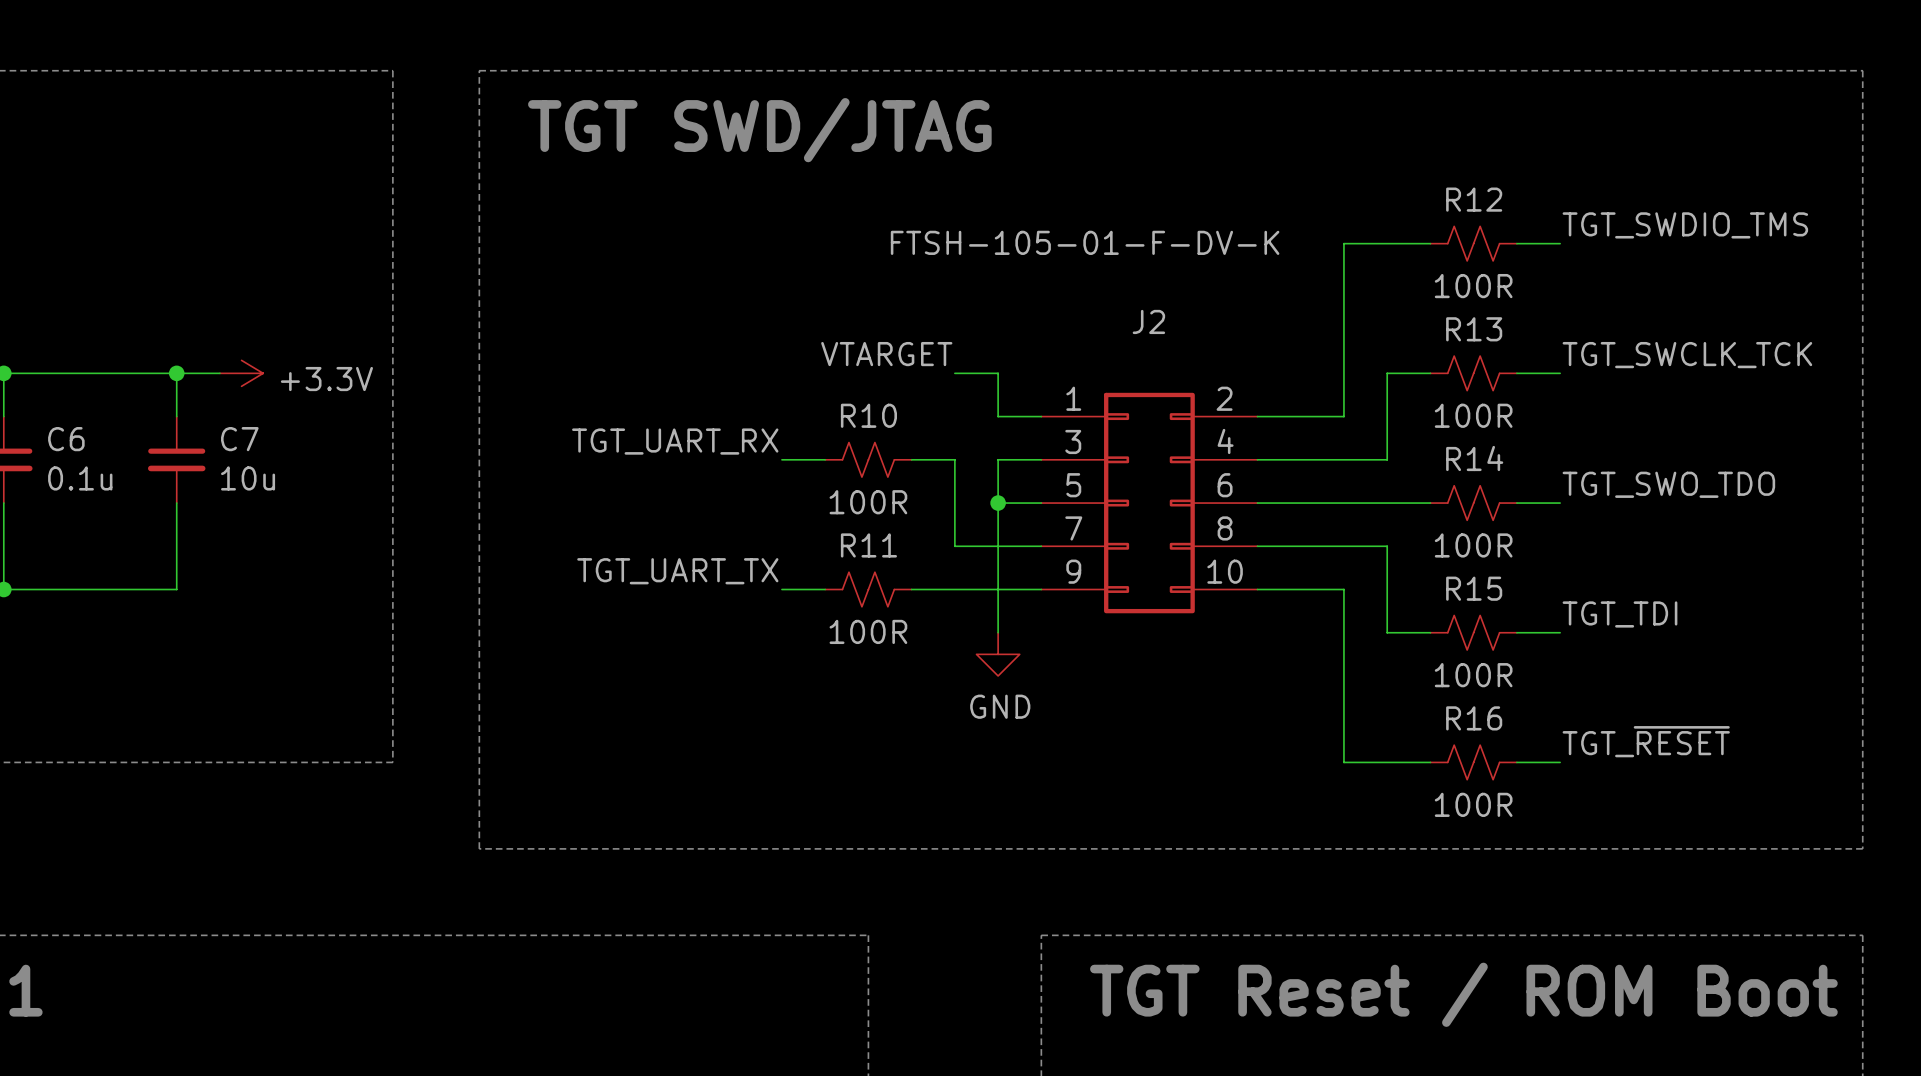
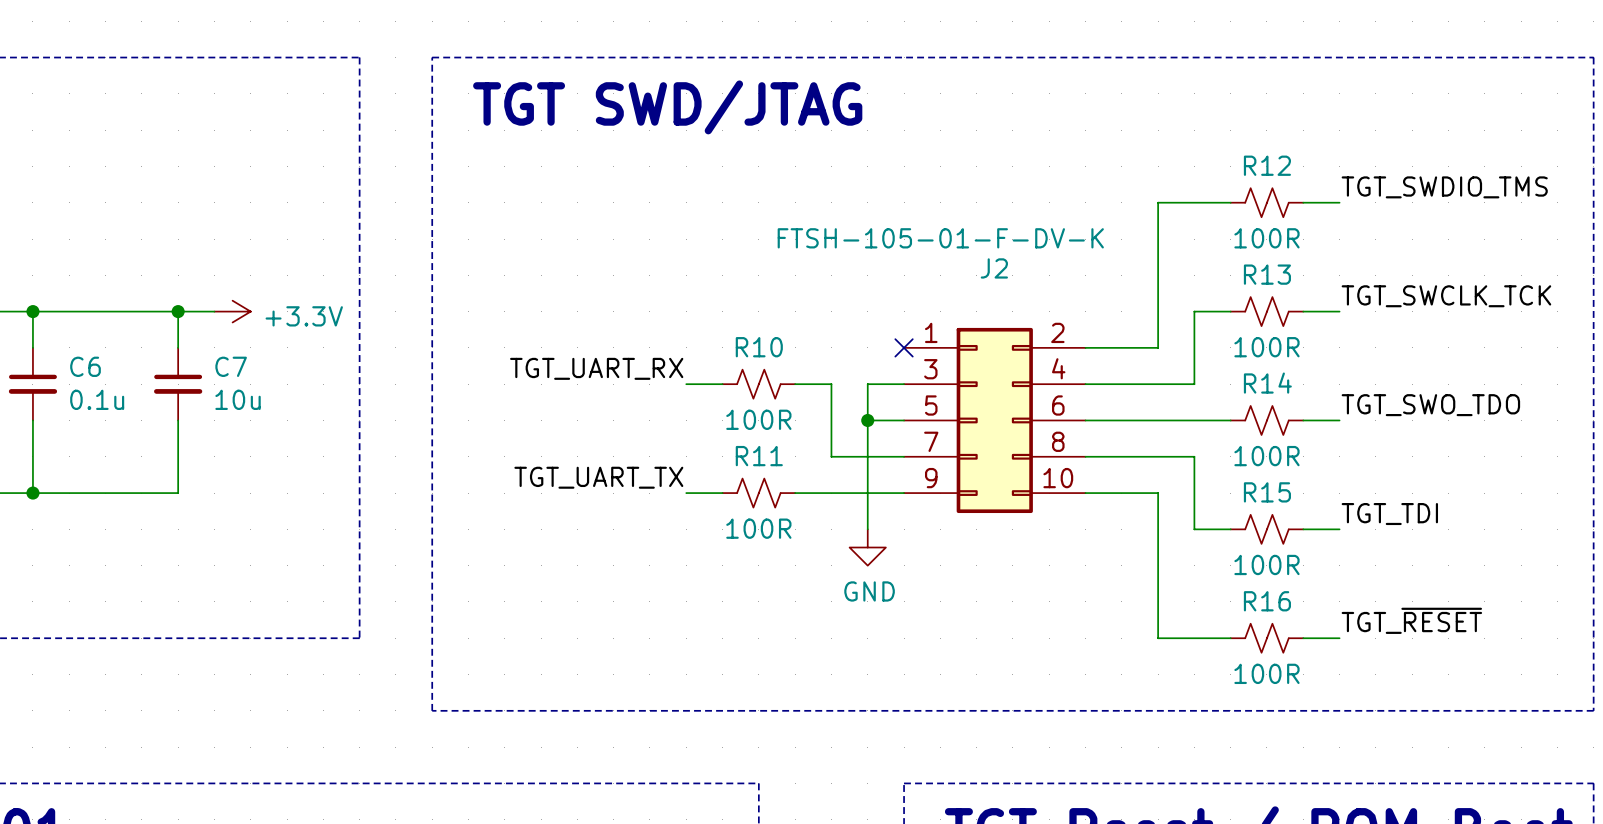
J2 value position: FTSH-105-01-F-DV-K (1085, 242) -> FTSH-105-01-F-DV-K (940, 238)
label: VTARGET (886, 354) -> none
wire: (954, 373) (998, 373) (998, 416) (1041, 416) -> none
no-connect mark: none -> (904, 347)

